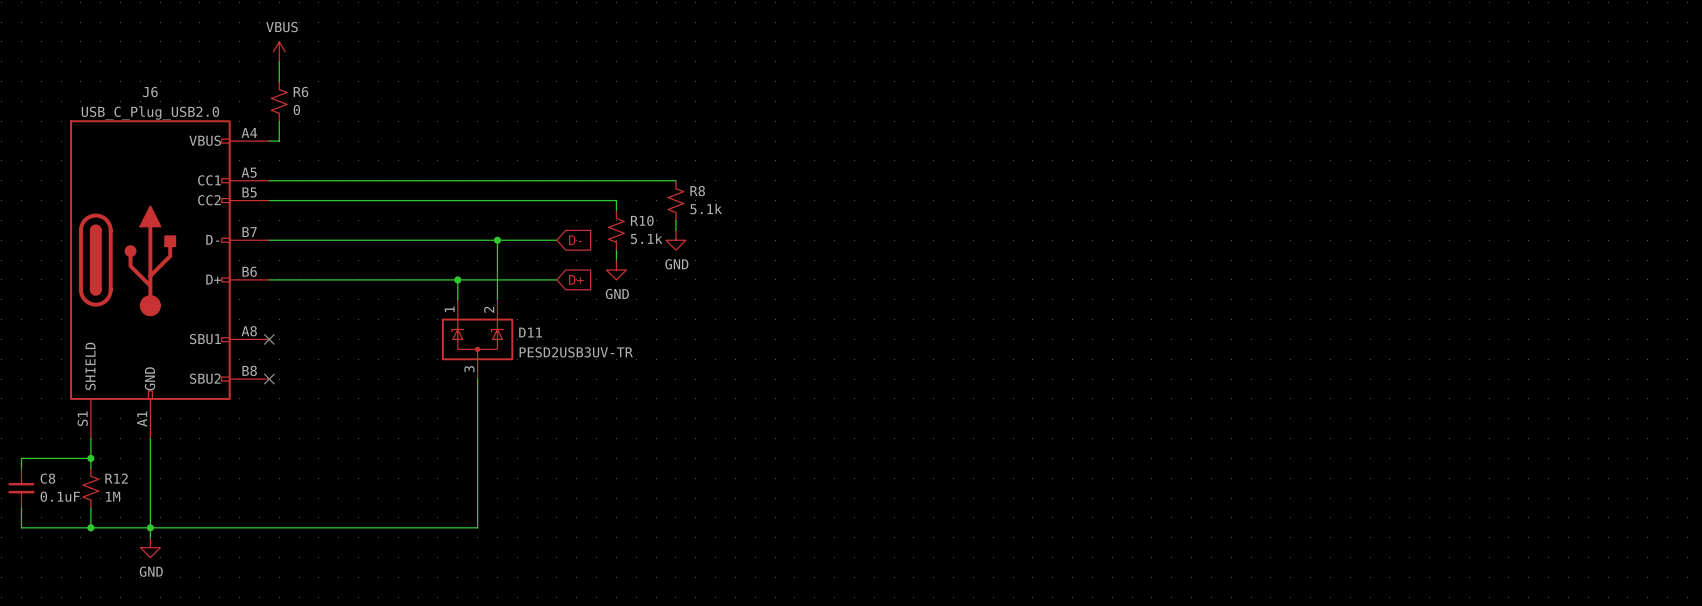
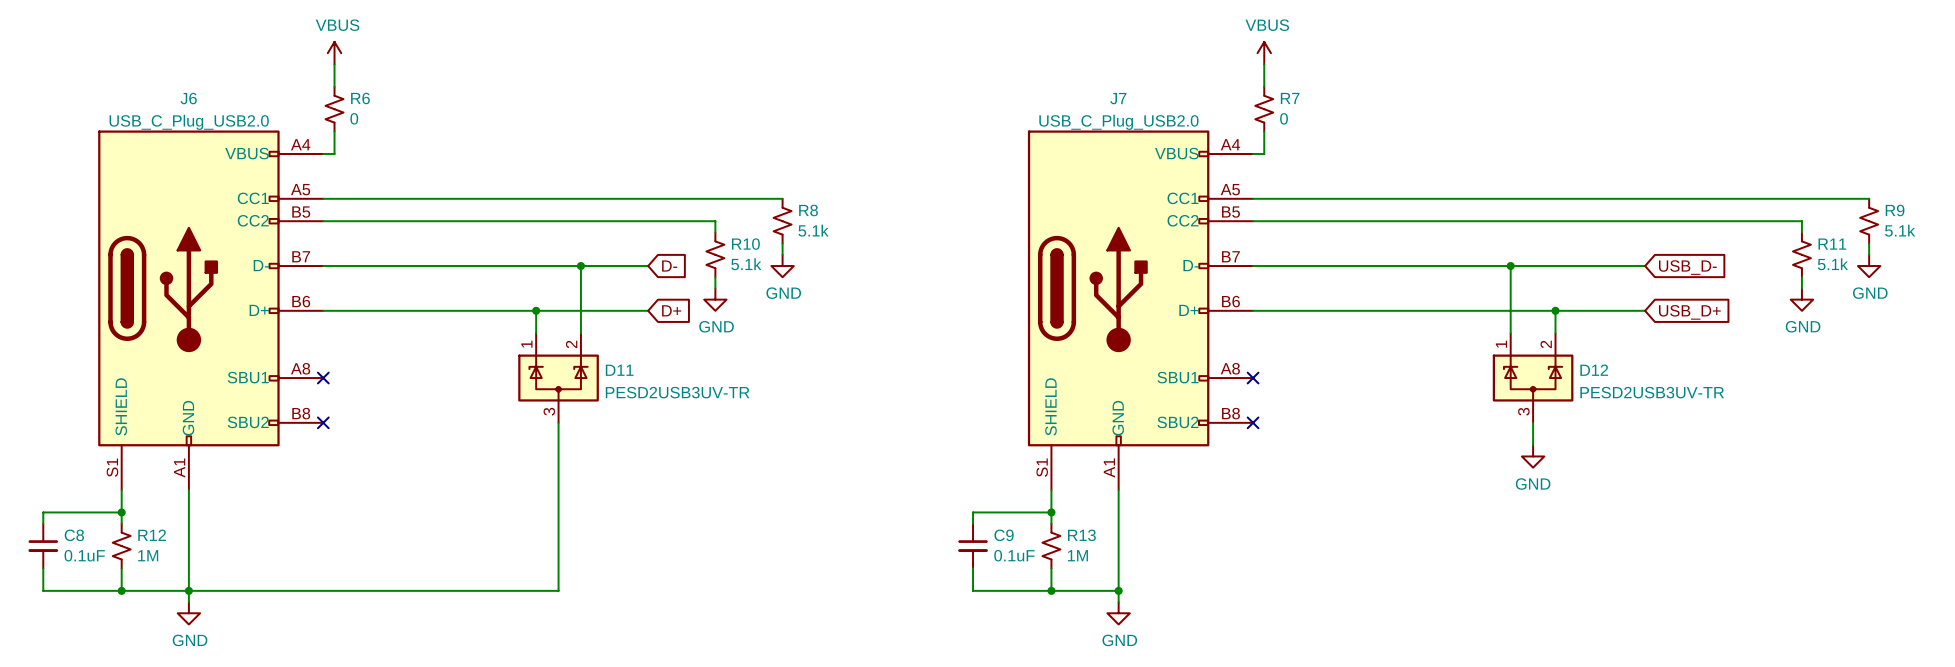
power symbol: none -> VBUS (1264, 53)
wire: none -> (1264, 64) (1264, 86)
R7: none -> 0 (1264, 109)
wire: none -> (1264, 131) (1264, 154) (1253, 154)
wire: none -> (1253, 198) (1869, 198)
wire: none -> (1253, 221) (1801, 221) (1801, 232)
R9: none -> 5.1k (1869, 221)
wire: none -> (1869, 243) (1869, 254)
R11: none -> 5.1k (1801, 254)
wire: none -> (1253, 266) (1645, 266)
wire: none -> (1510, 266) (1510, 333)
junction: none -> (1510, 266)
power symbol: none -> GND (1869, 266)
global label: none -> USB_D- (1687, 267)
wire: none -> (1801, 277) (1801, 288)
power symbol: none -> GND (1801, 299)
J7: none -> USB_C_Plug_USB2.0 (1140, 310)
wire: none -> (1253, 310) (1645, 310)
wire: none -> (1555, 310) (1555, 333)
junction: none -> (1555, 310)
global label: none -> USB_D+ (1689, 312)
no-connect mark: none -> (1253, 378)
D12: none -> PESD2USB3UV-TR (1533, 378)
no-connect mark: none -> (1253, 422)
wire: none -> (1533, 422) (1533, 445)
power symbol: none -> GND (1533, 456)
wire: none -> (1051, 490) (1051, 523)
wire: none -> (1118, 490) (1118, 602)
wire: none -> (1051, 512) (973, 512) (973, 523)
junction: none -> (1051, 512)
C9: none -> 0.1uF (973, 546)
R13: none -> 1M (1051, 546)
wire: none -> (973, 568) (973, 590) (1118, 590)
wire: none -> (1051, 568) (1051, 590)
junction: none -> (1051, 590)
junction: none -> (1118, 590)
power symbol: none -> GND (1118, 613)

